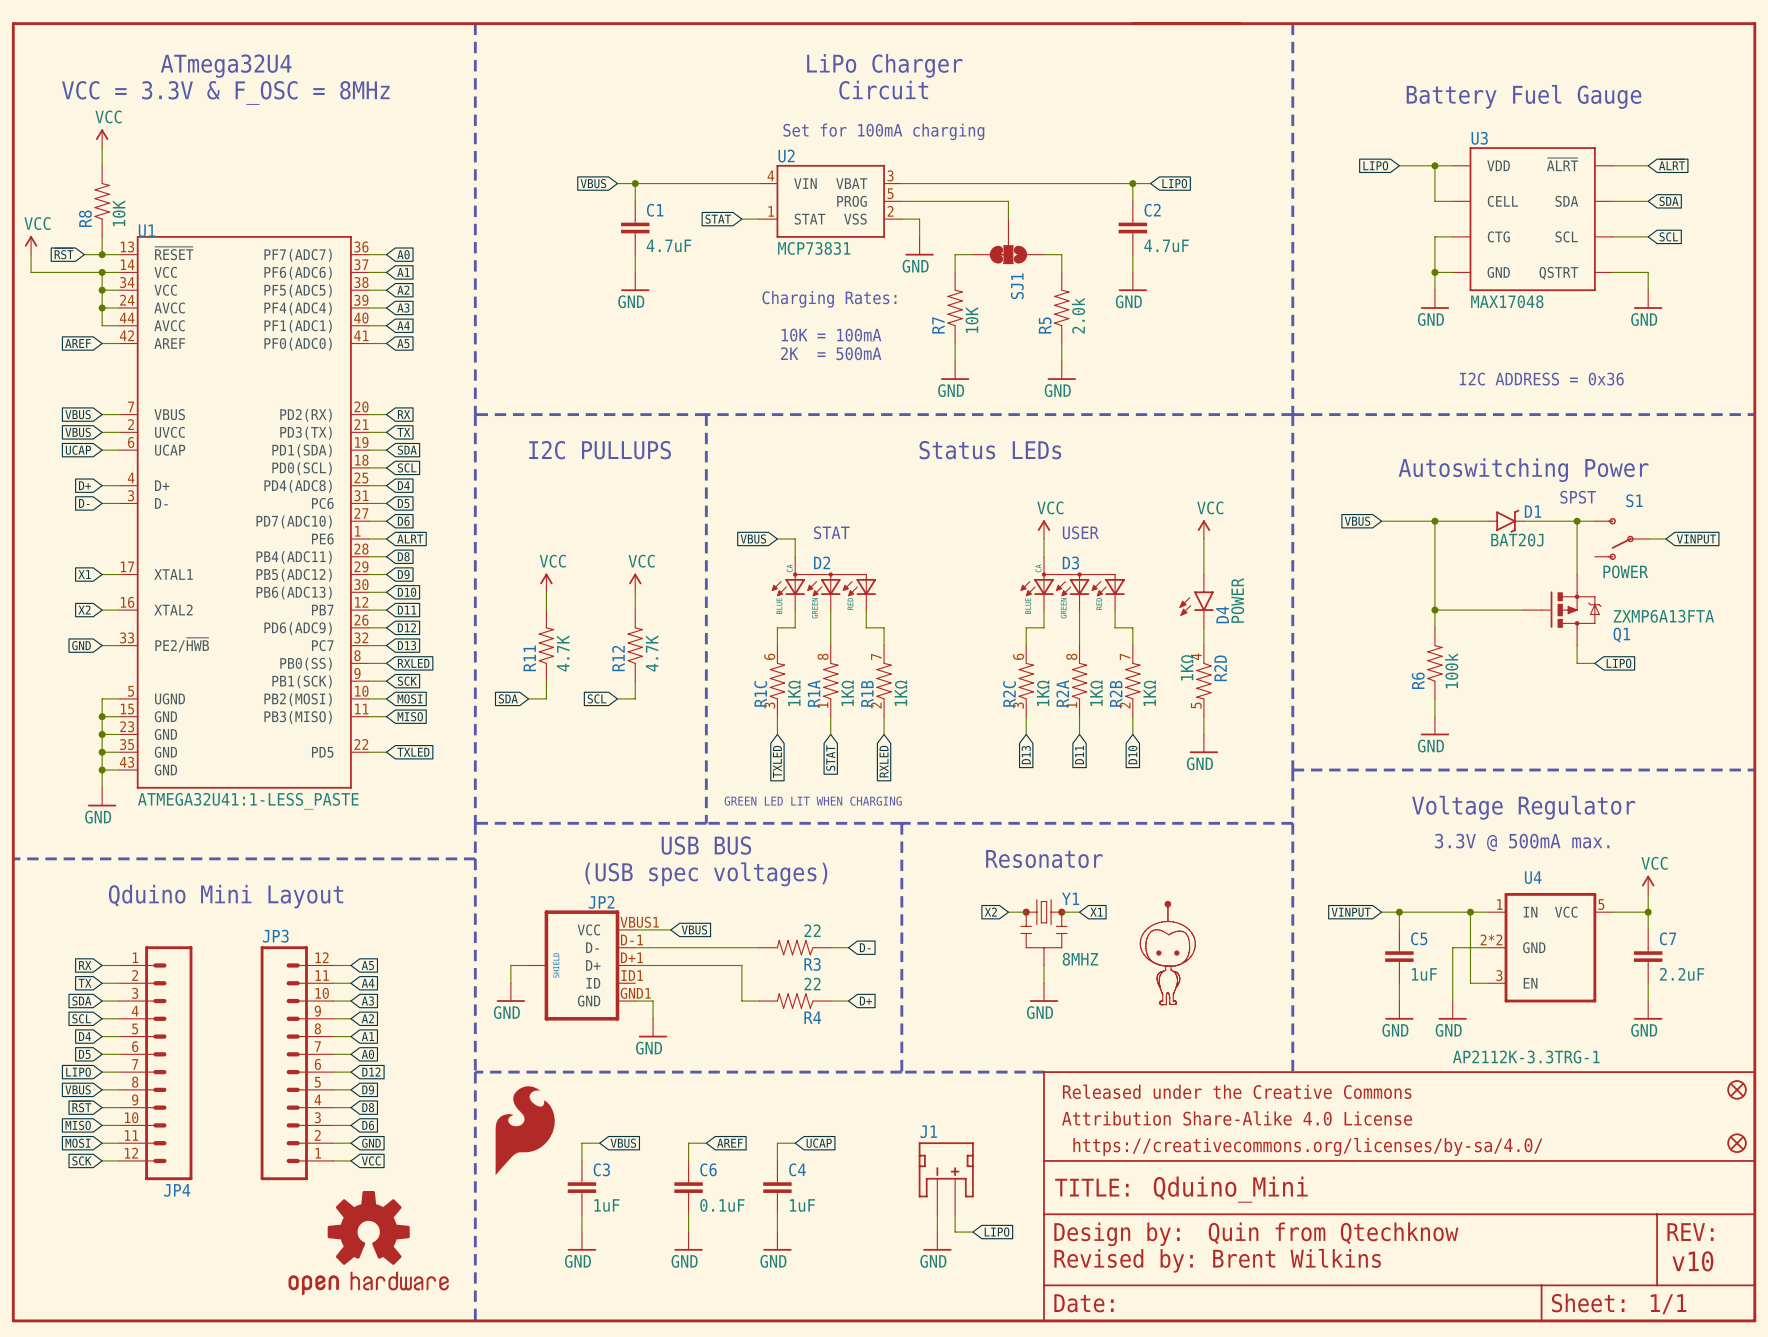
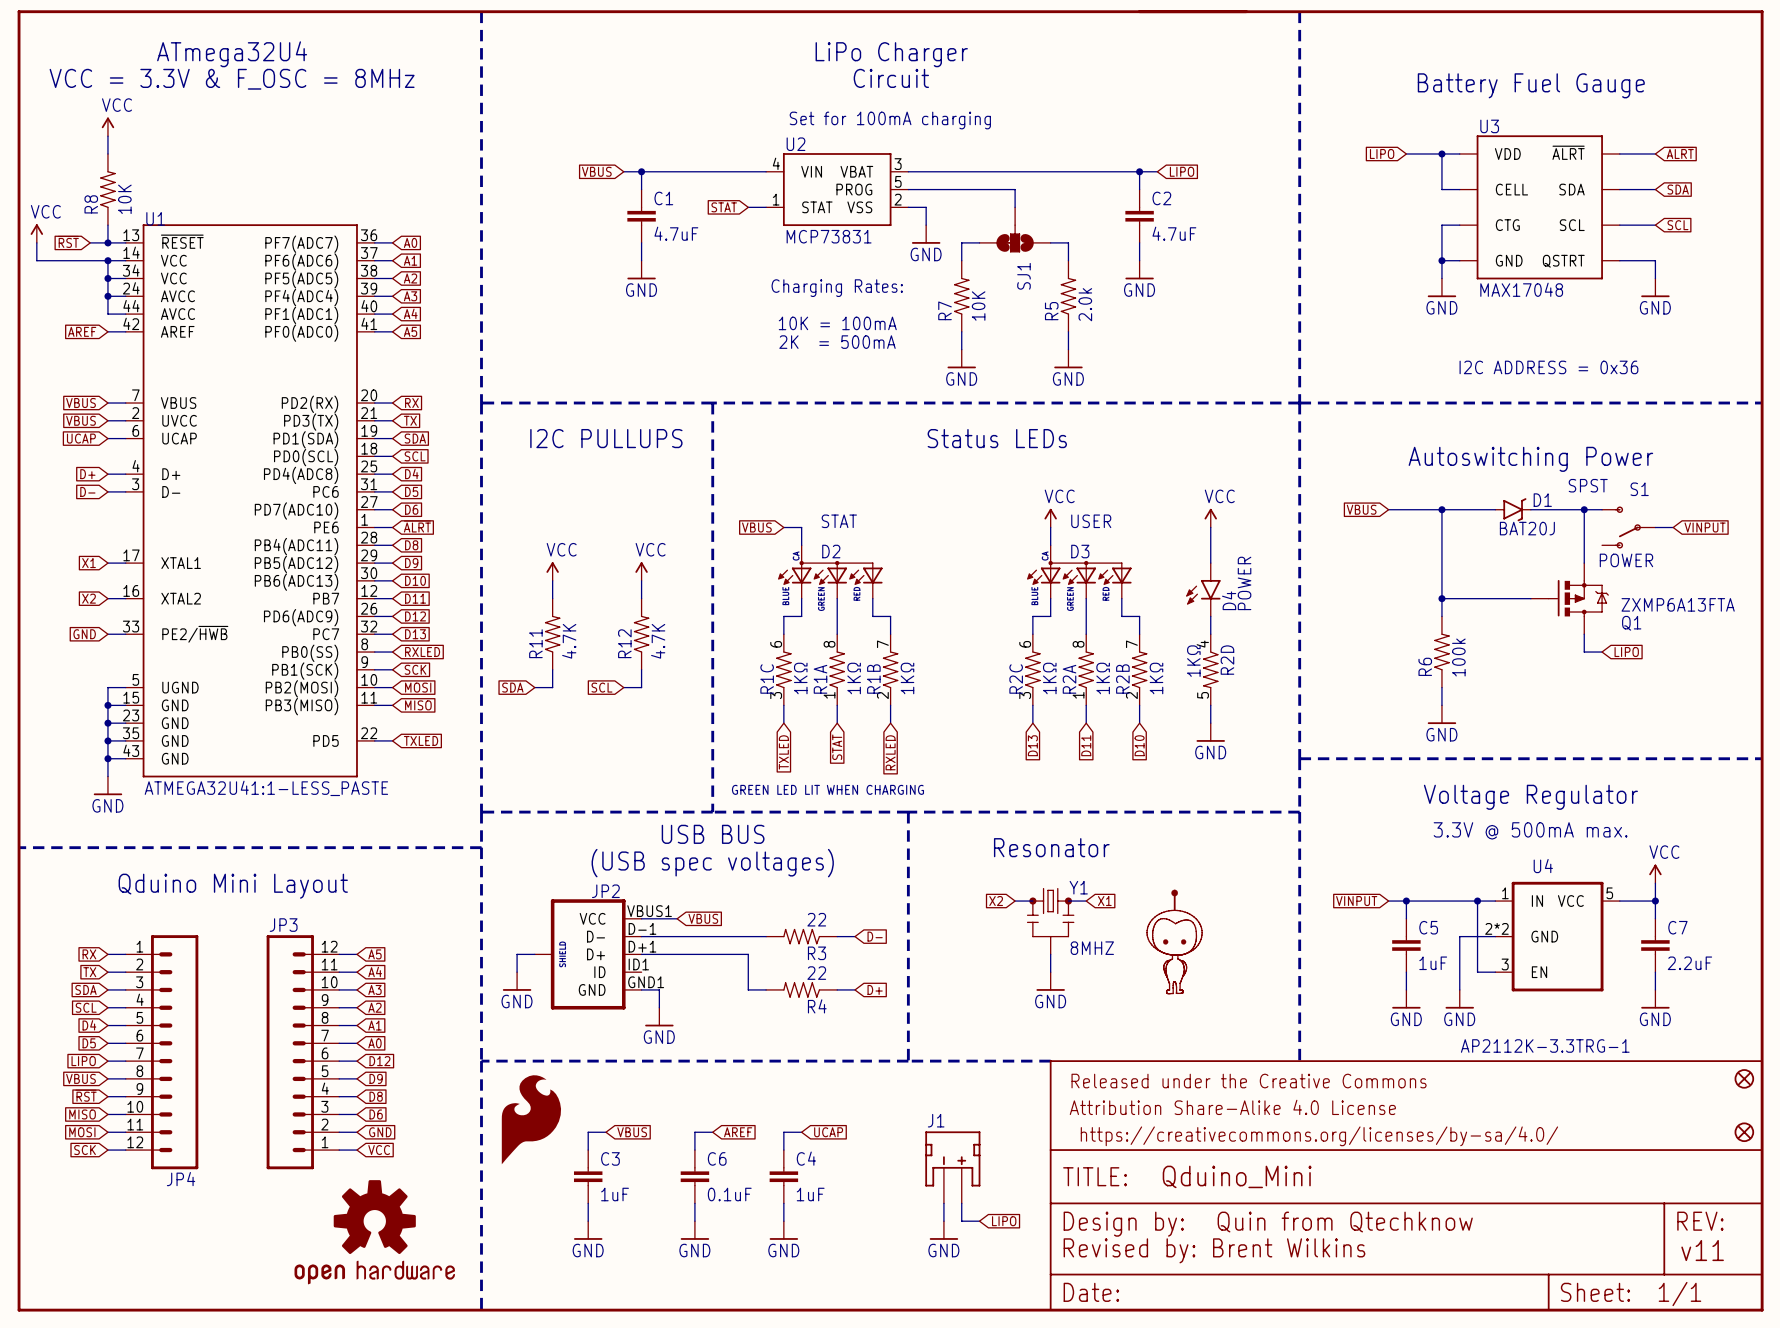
text: v10 (1692, 1261) -> v11 (1702, 1250)

